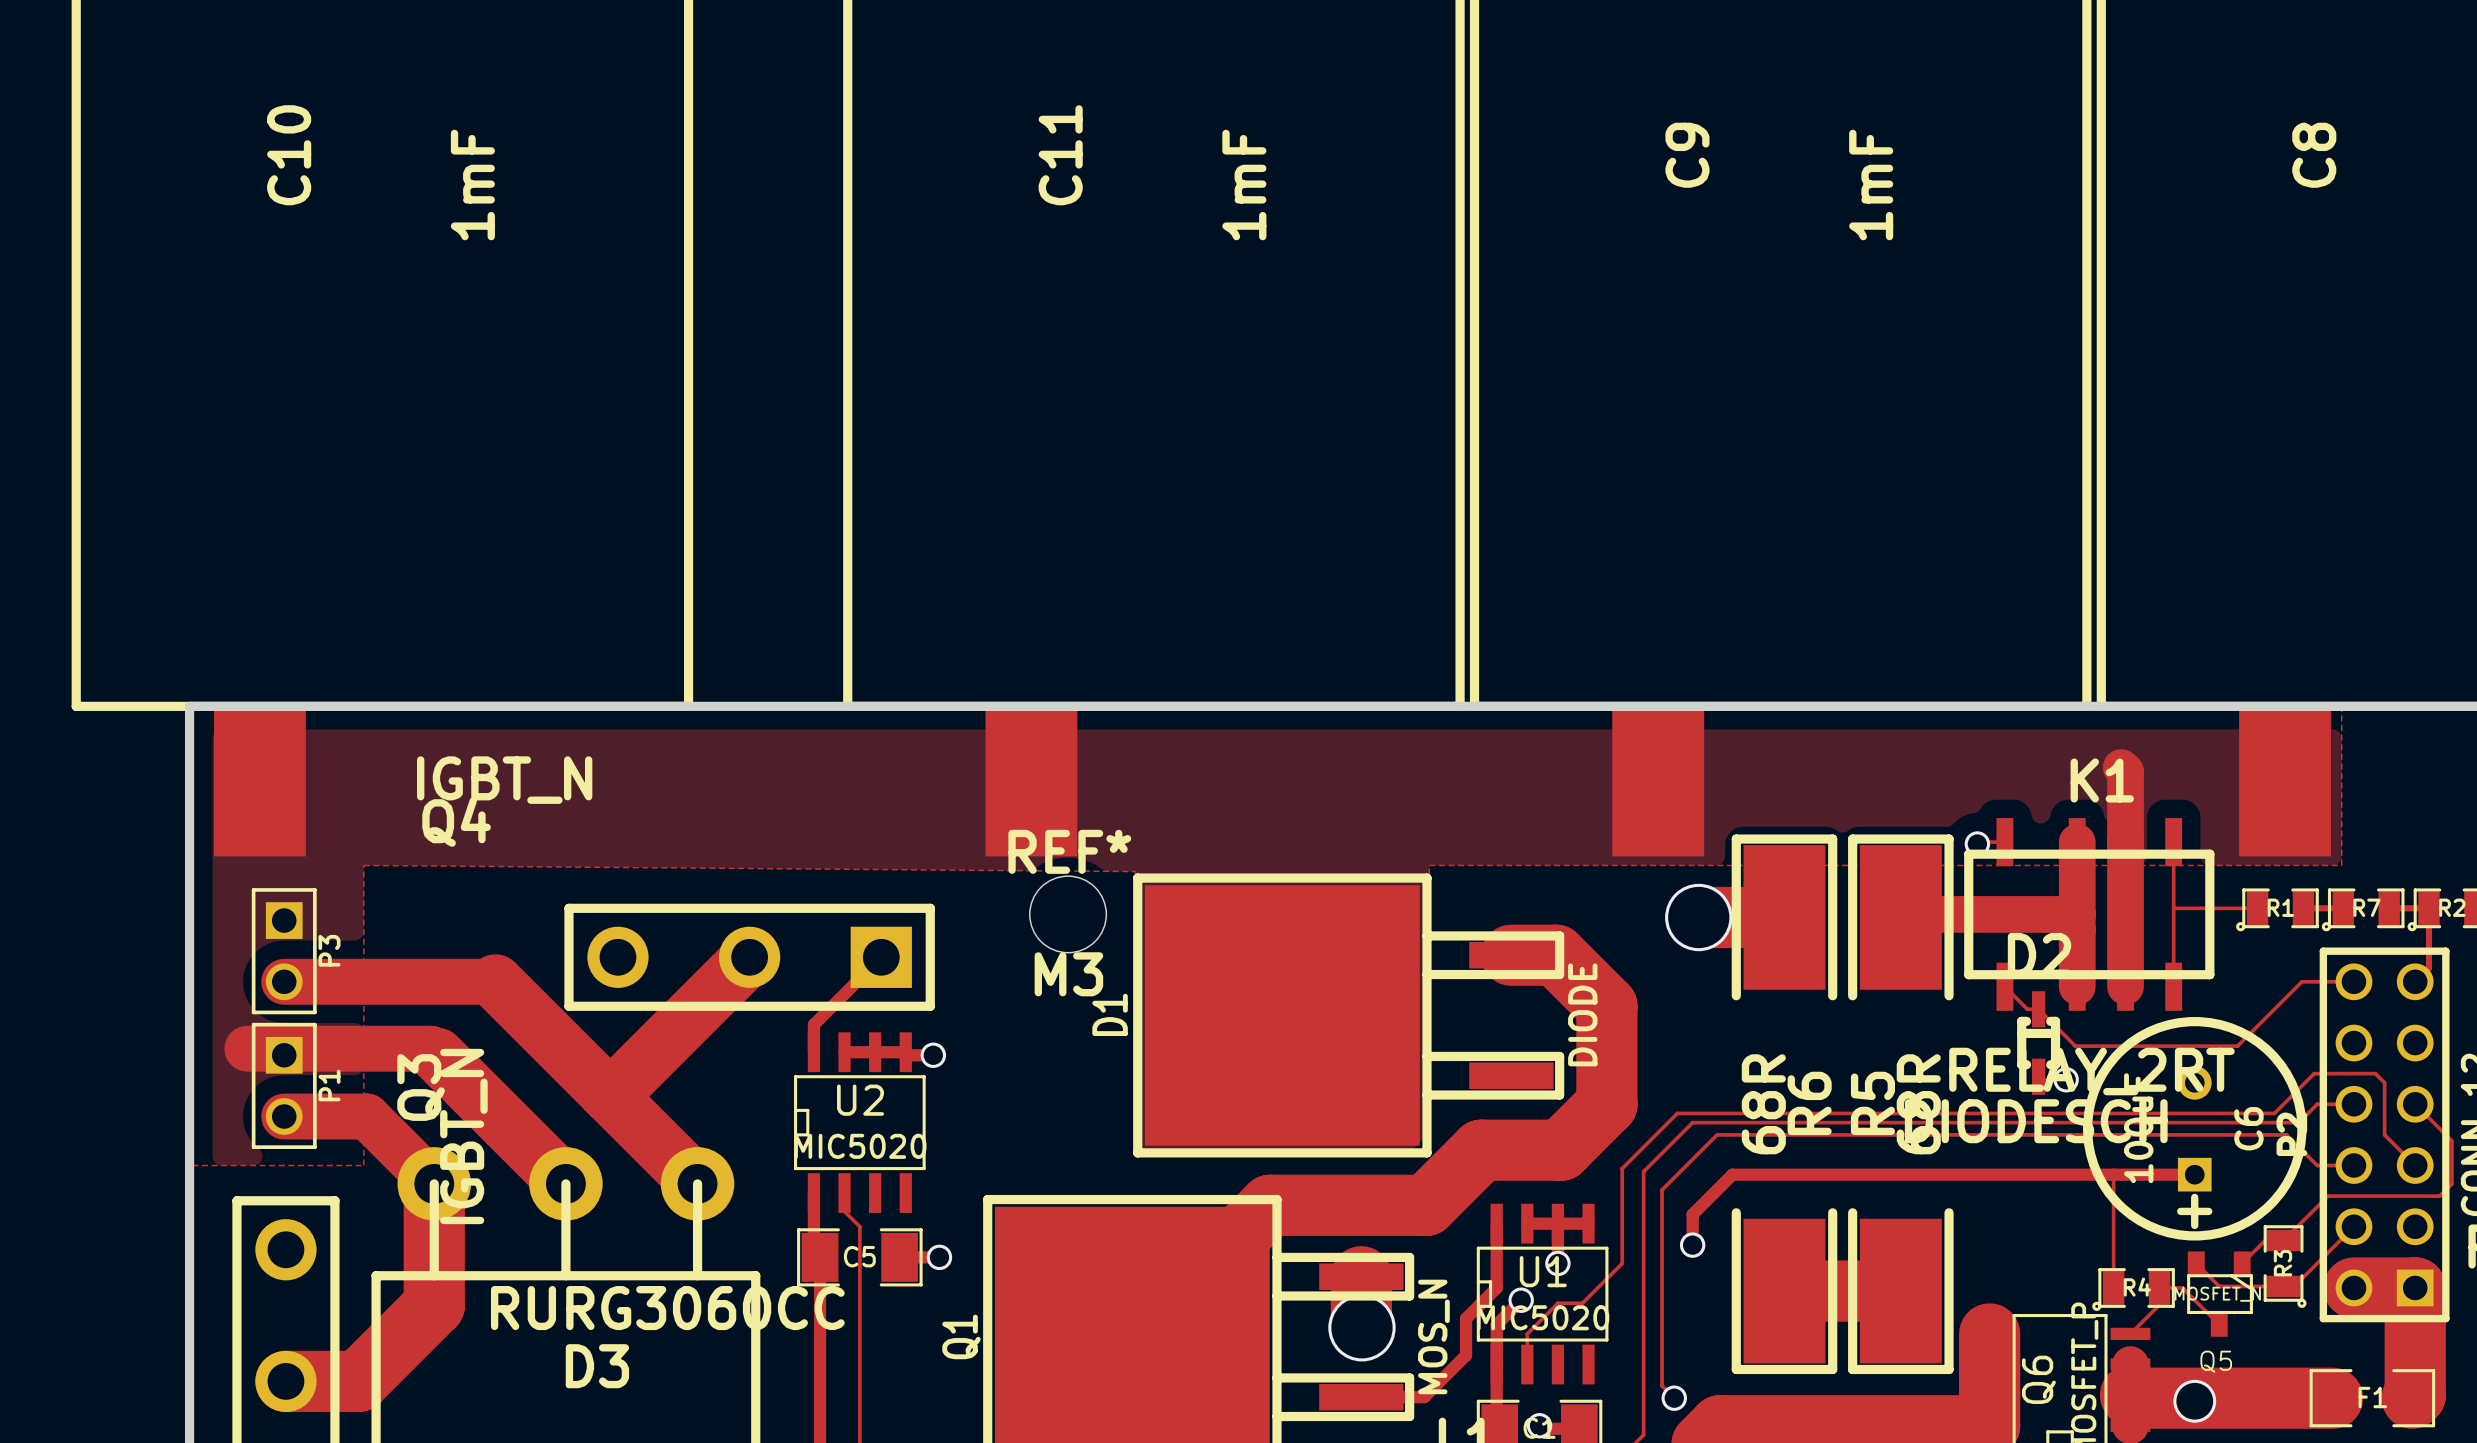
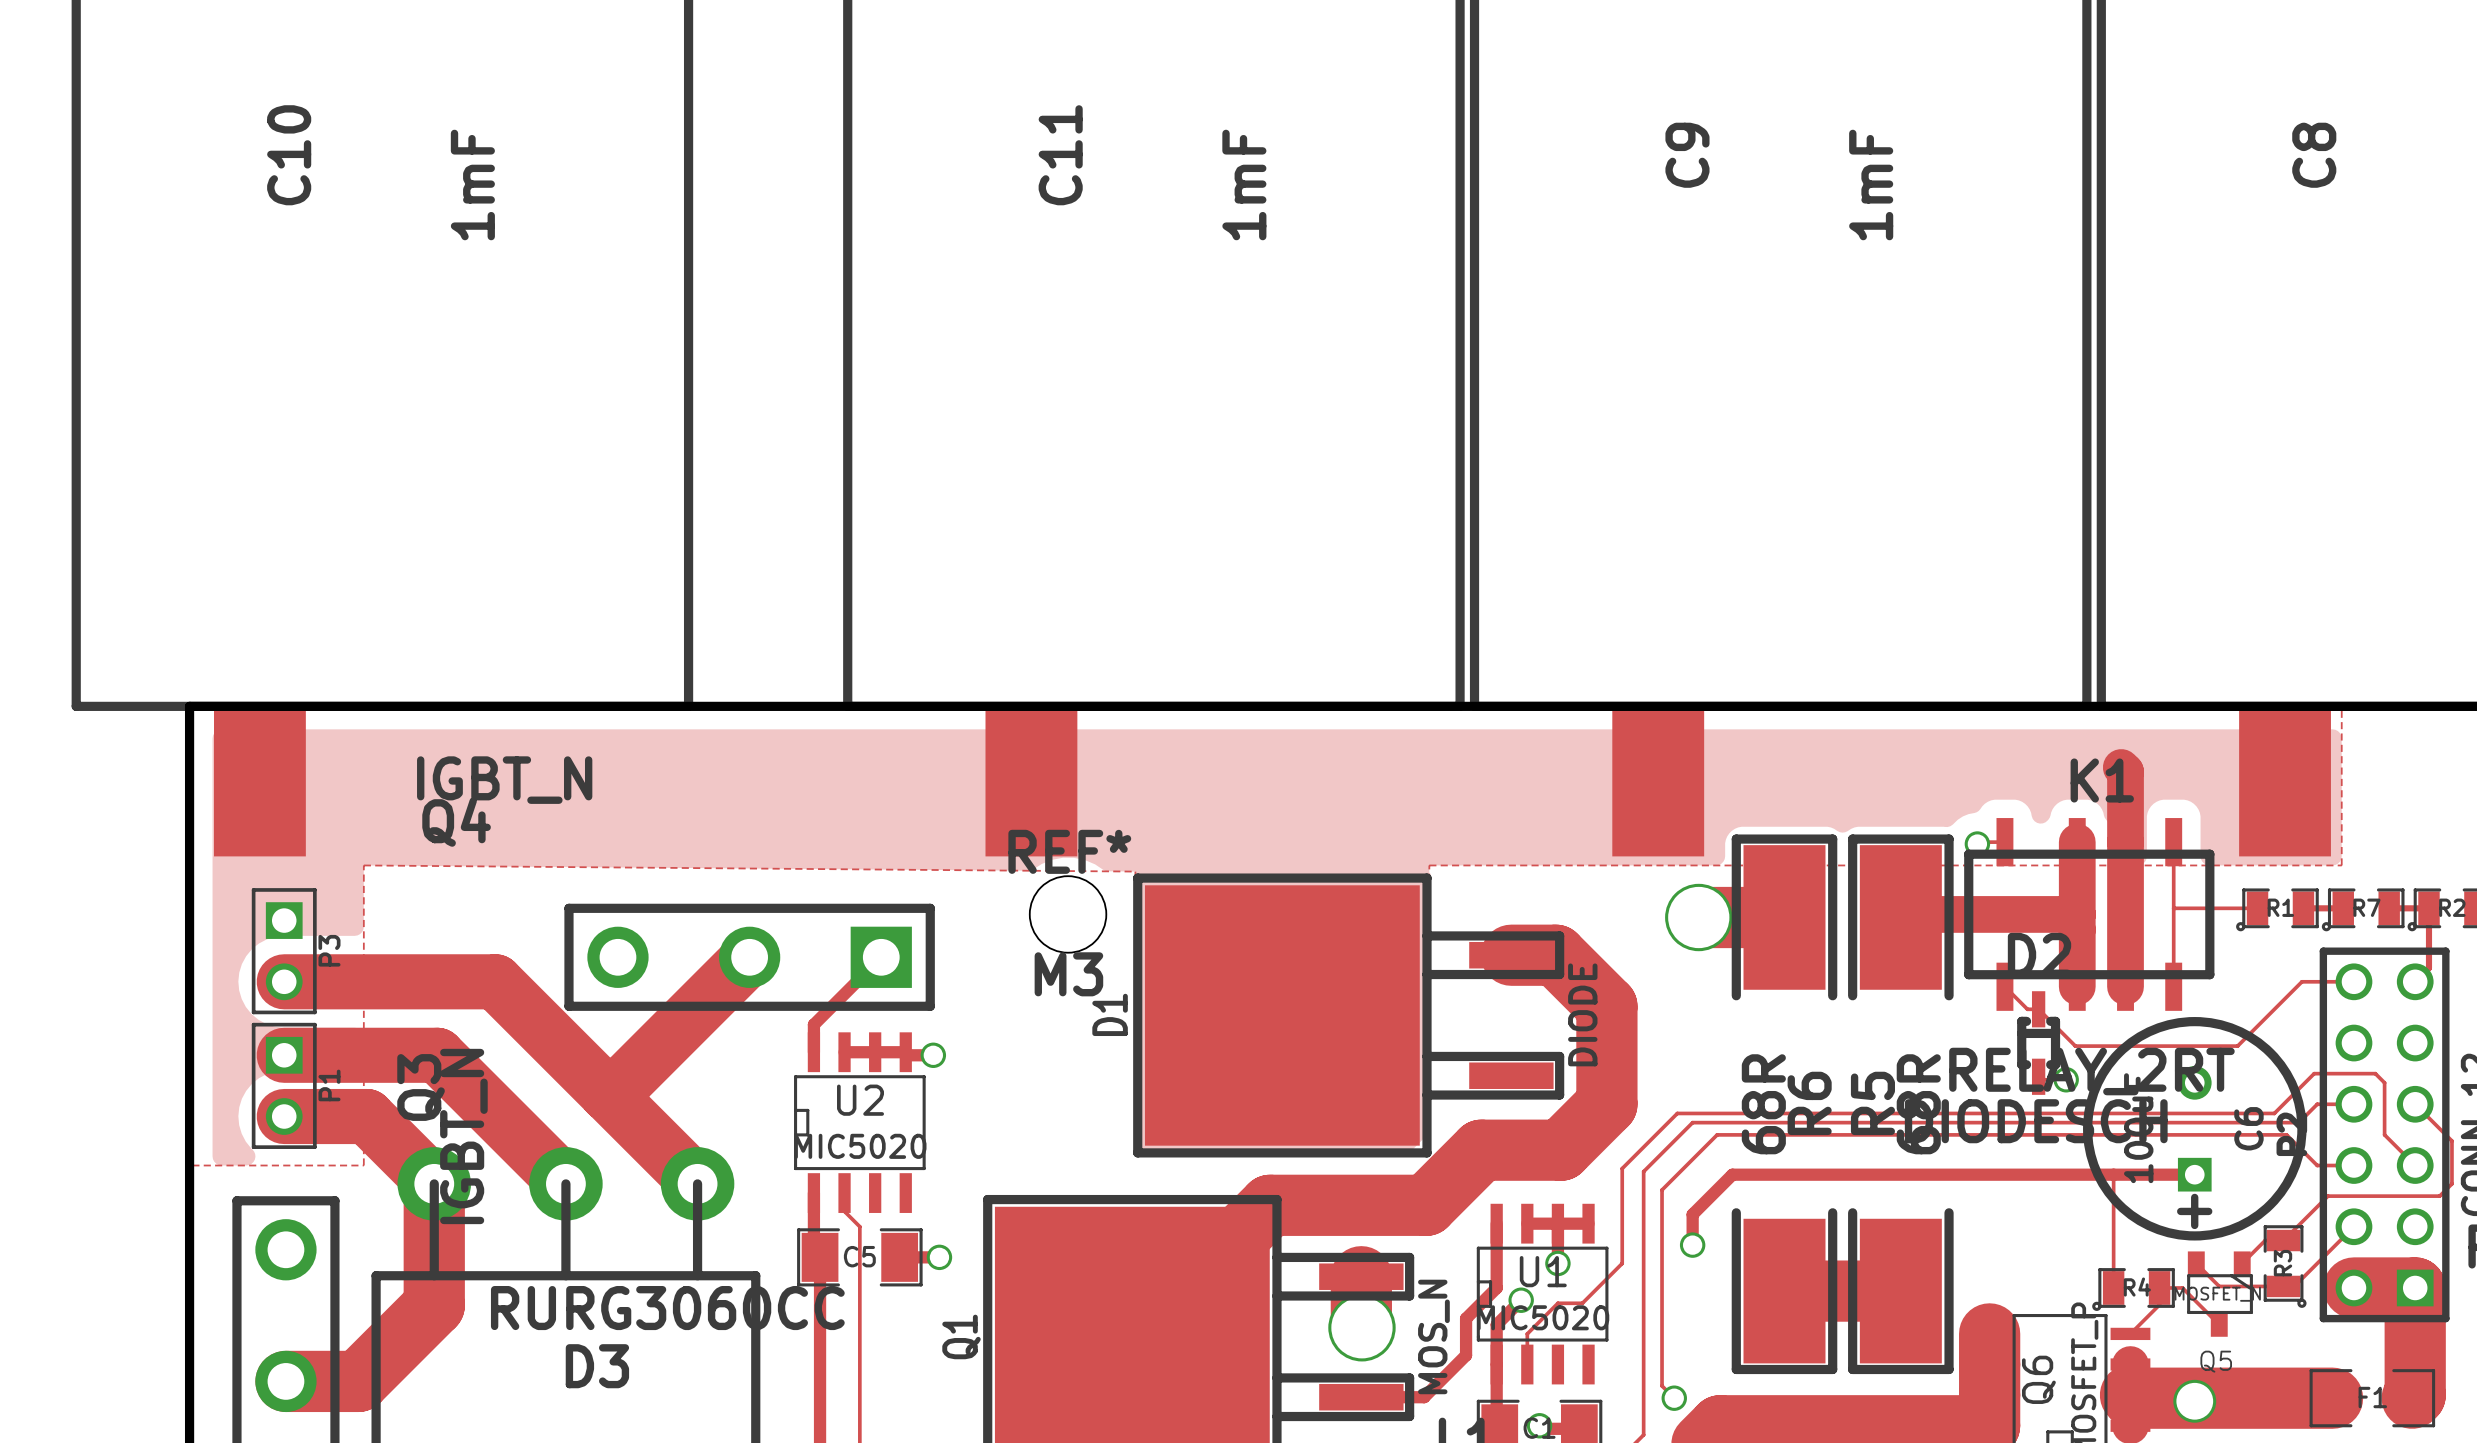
track width: thin (284, 981) (495, 981) -> thick (284, 981) (495, 981)
track: (247, 1048) (430, 1048) (437, 1055) -> (284, 1055) (437, 1055)
track width: thin (284, 1116) (366, 1116) (434, 1183) -> thick (284, 1116) (366, 1116) (434, 1183)

